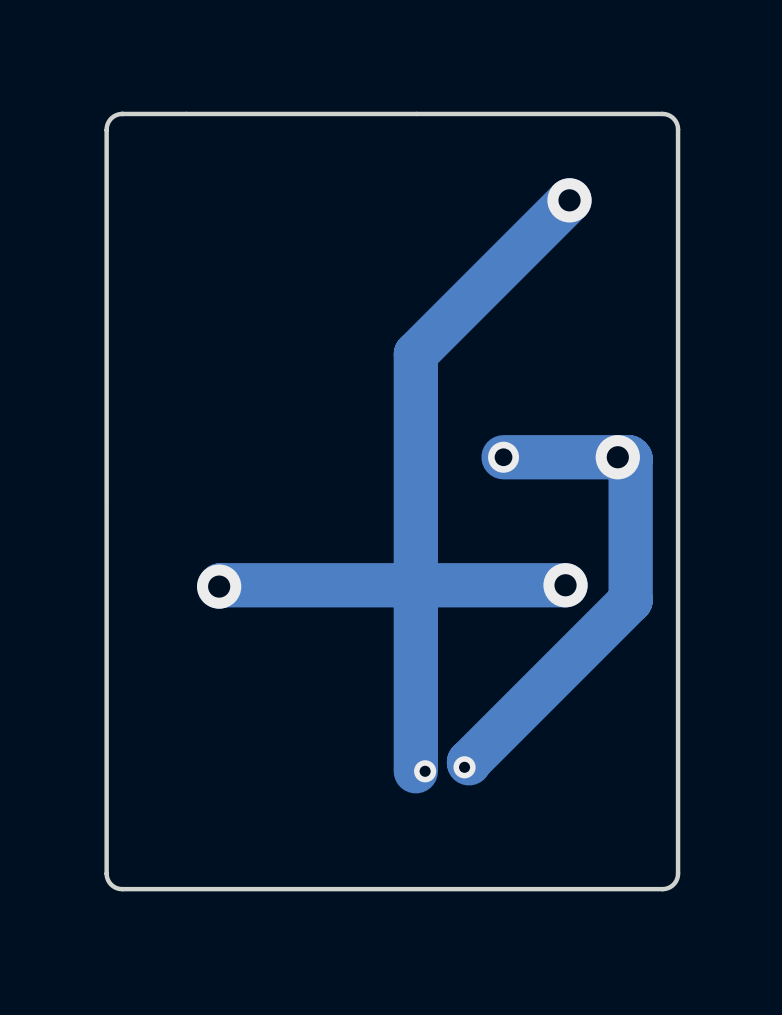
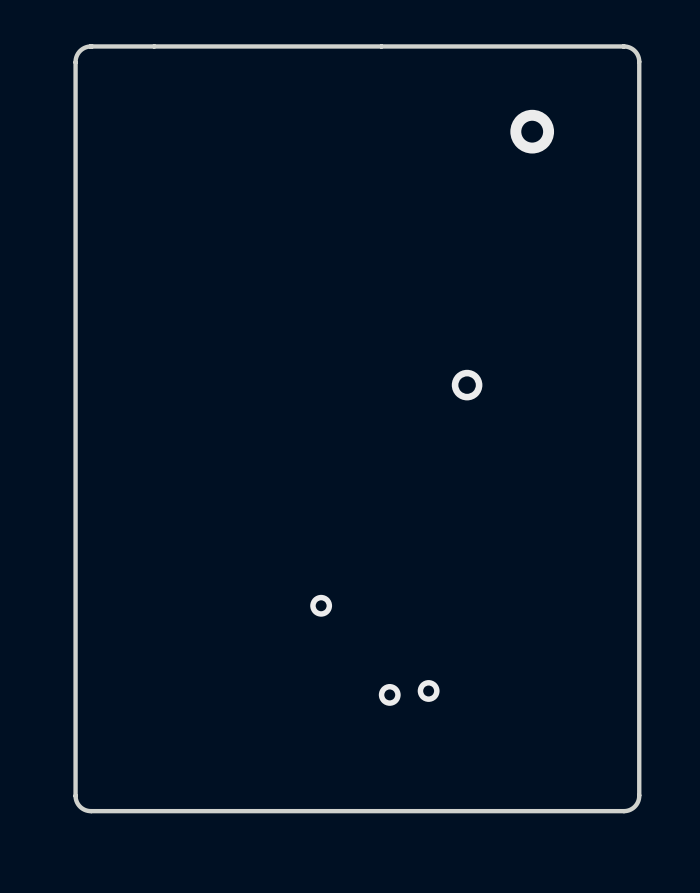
track: (569, 200) (415, 354) (415, 771) -> none
track: (503, 457) (628, 457) (630, 459) (630, 600) (468, 763) -> none
via: (617, 457) -> none
track: (565, 585) (219, 586) -> none
via: (565, 585) -> none
via: (219, 586) -> none
via: none -> (321, 605)

